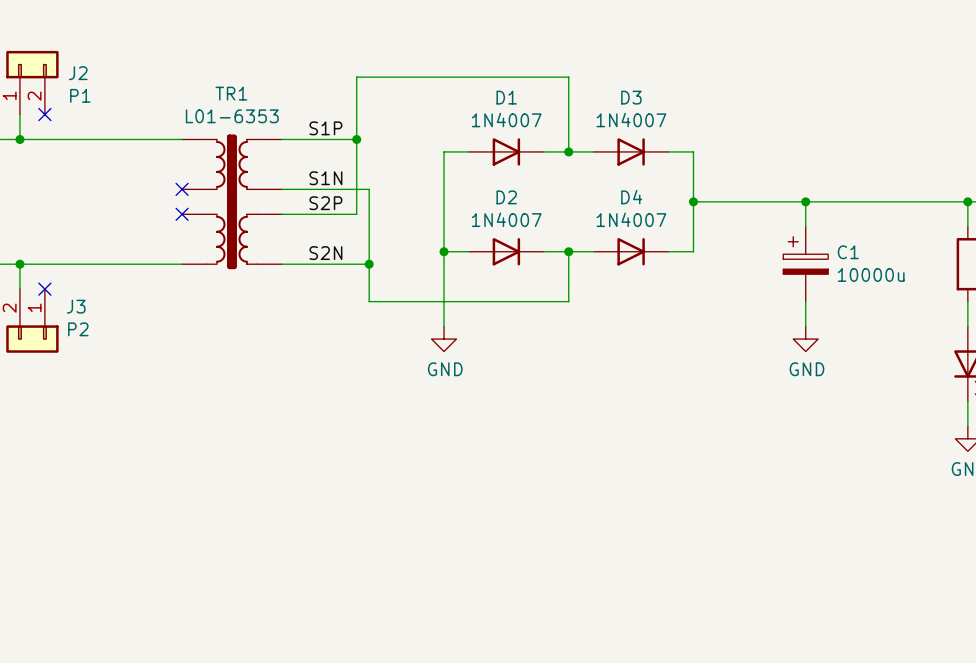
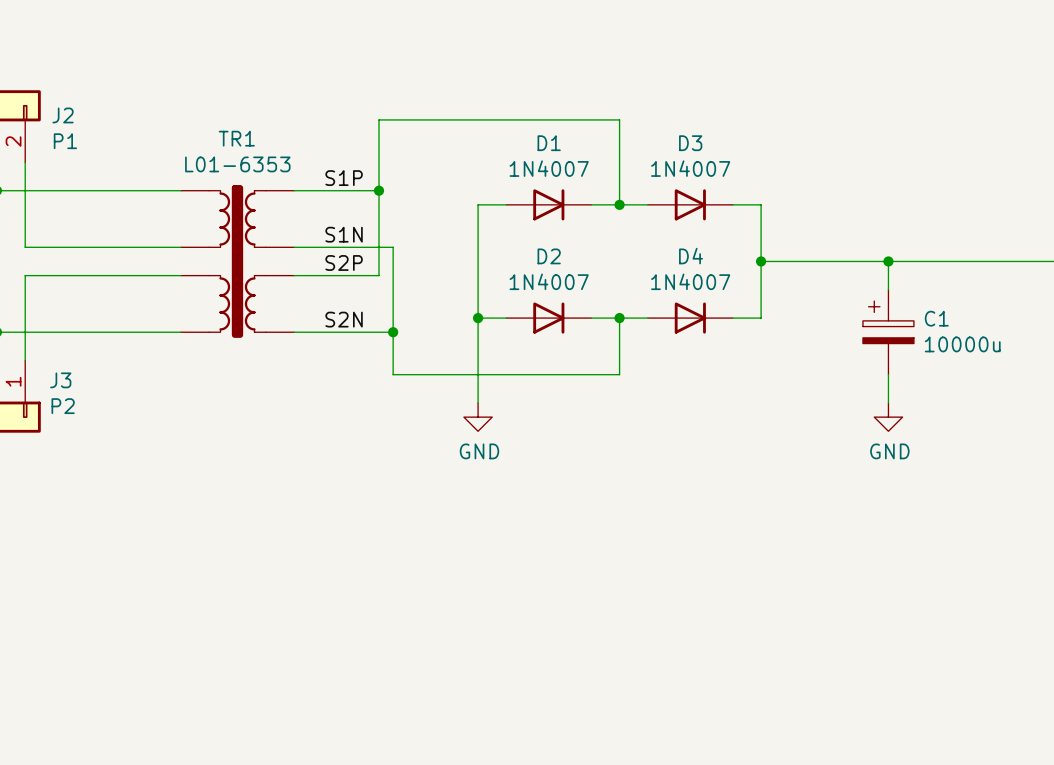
wire: none -> (25, 162) (25, 247) (180, 247)
no-connect mark: (44, 114) -> none
no-connect mark: (182, 189) -> none
wire: none -> (180, 275) (25, 275) (25, 360)
no-connect mark: (182, 214) -> none
no-connect mark: (44, 289) -> none

